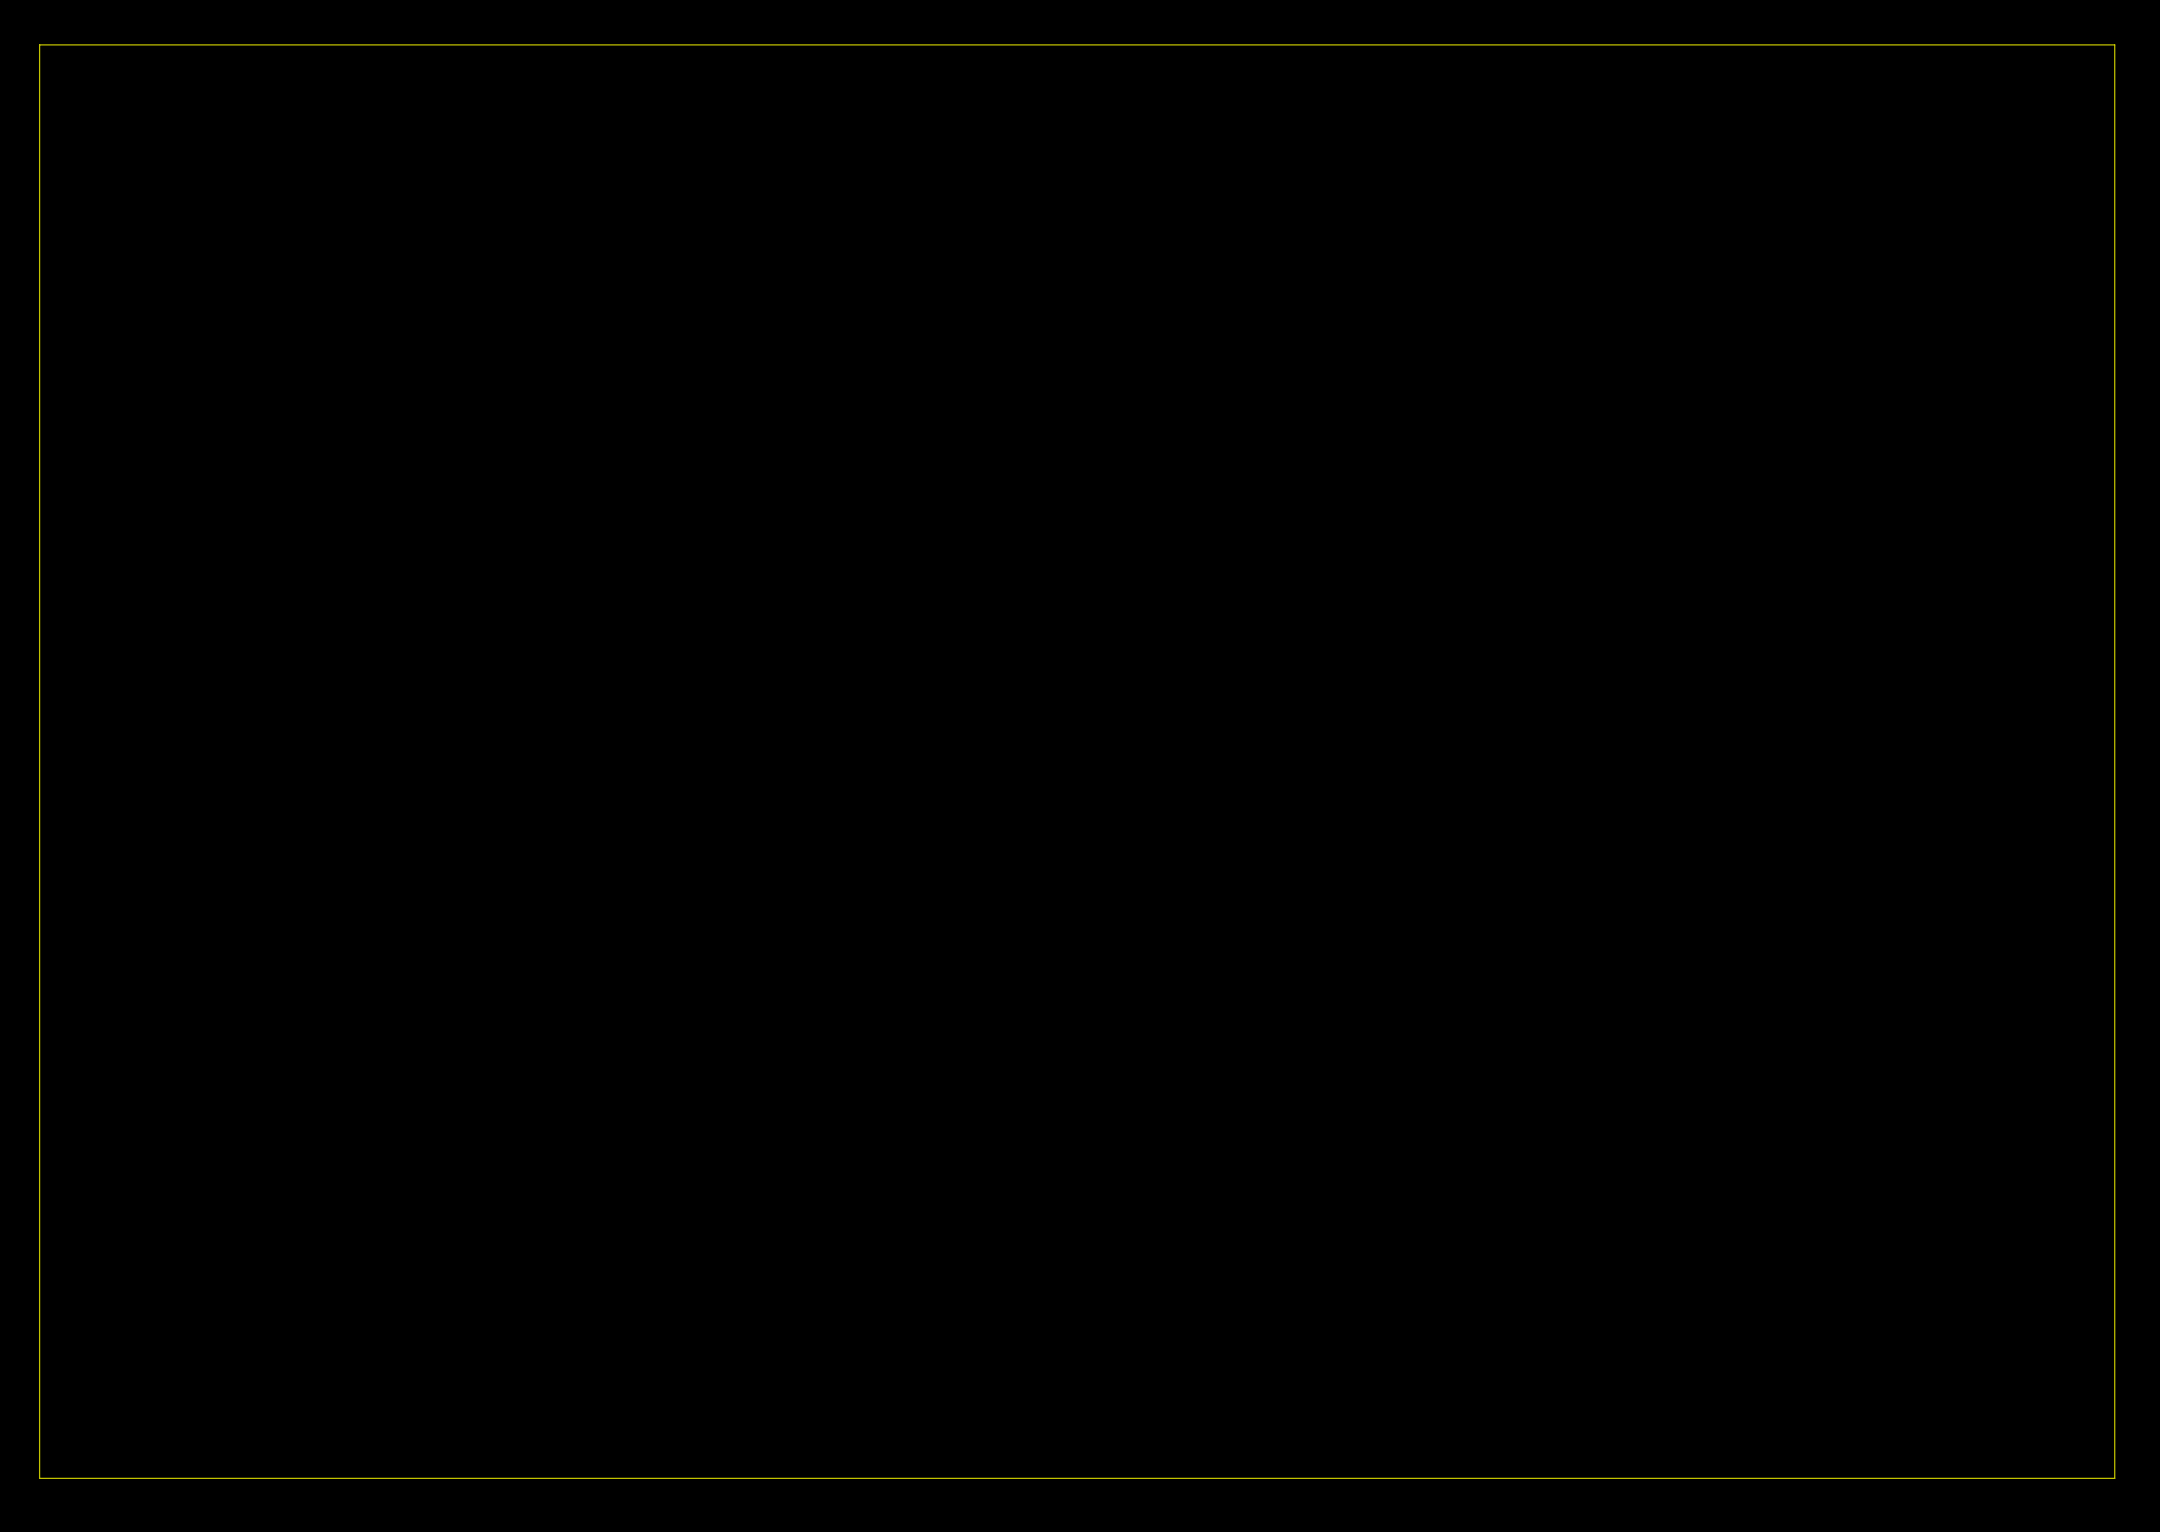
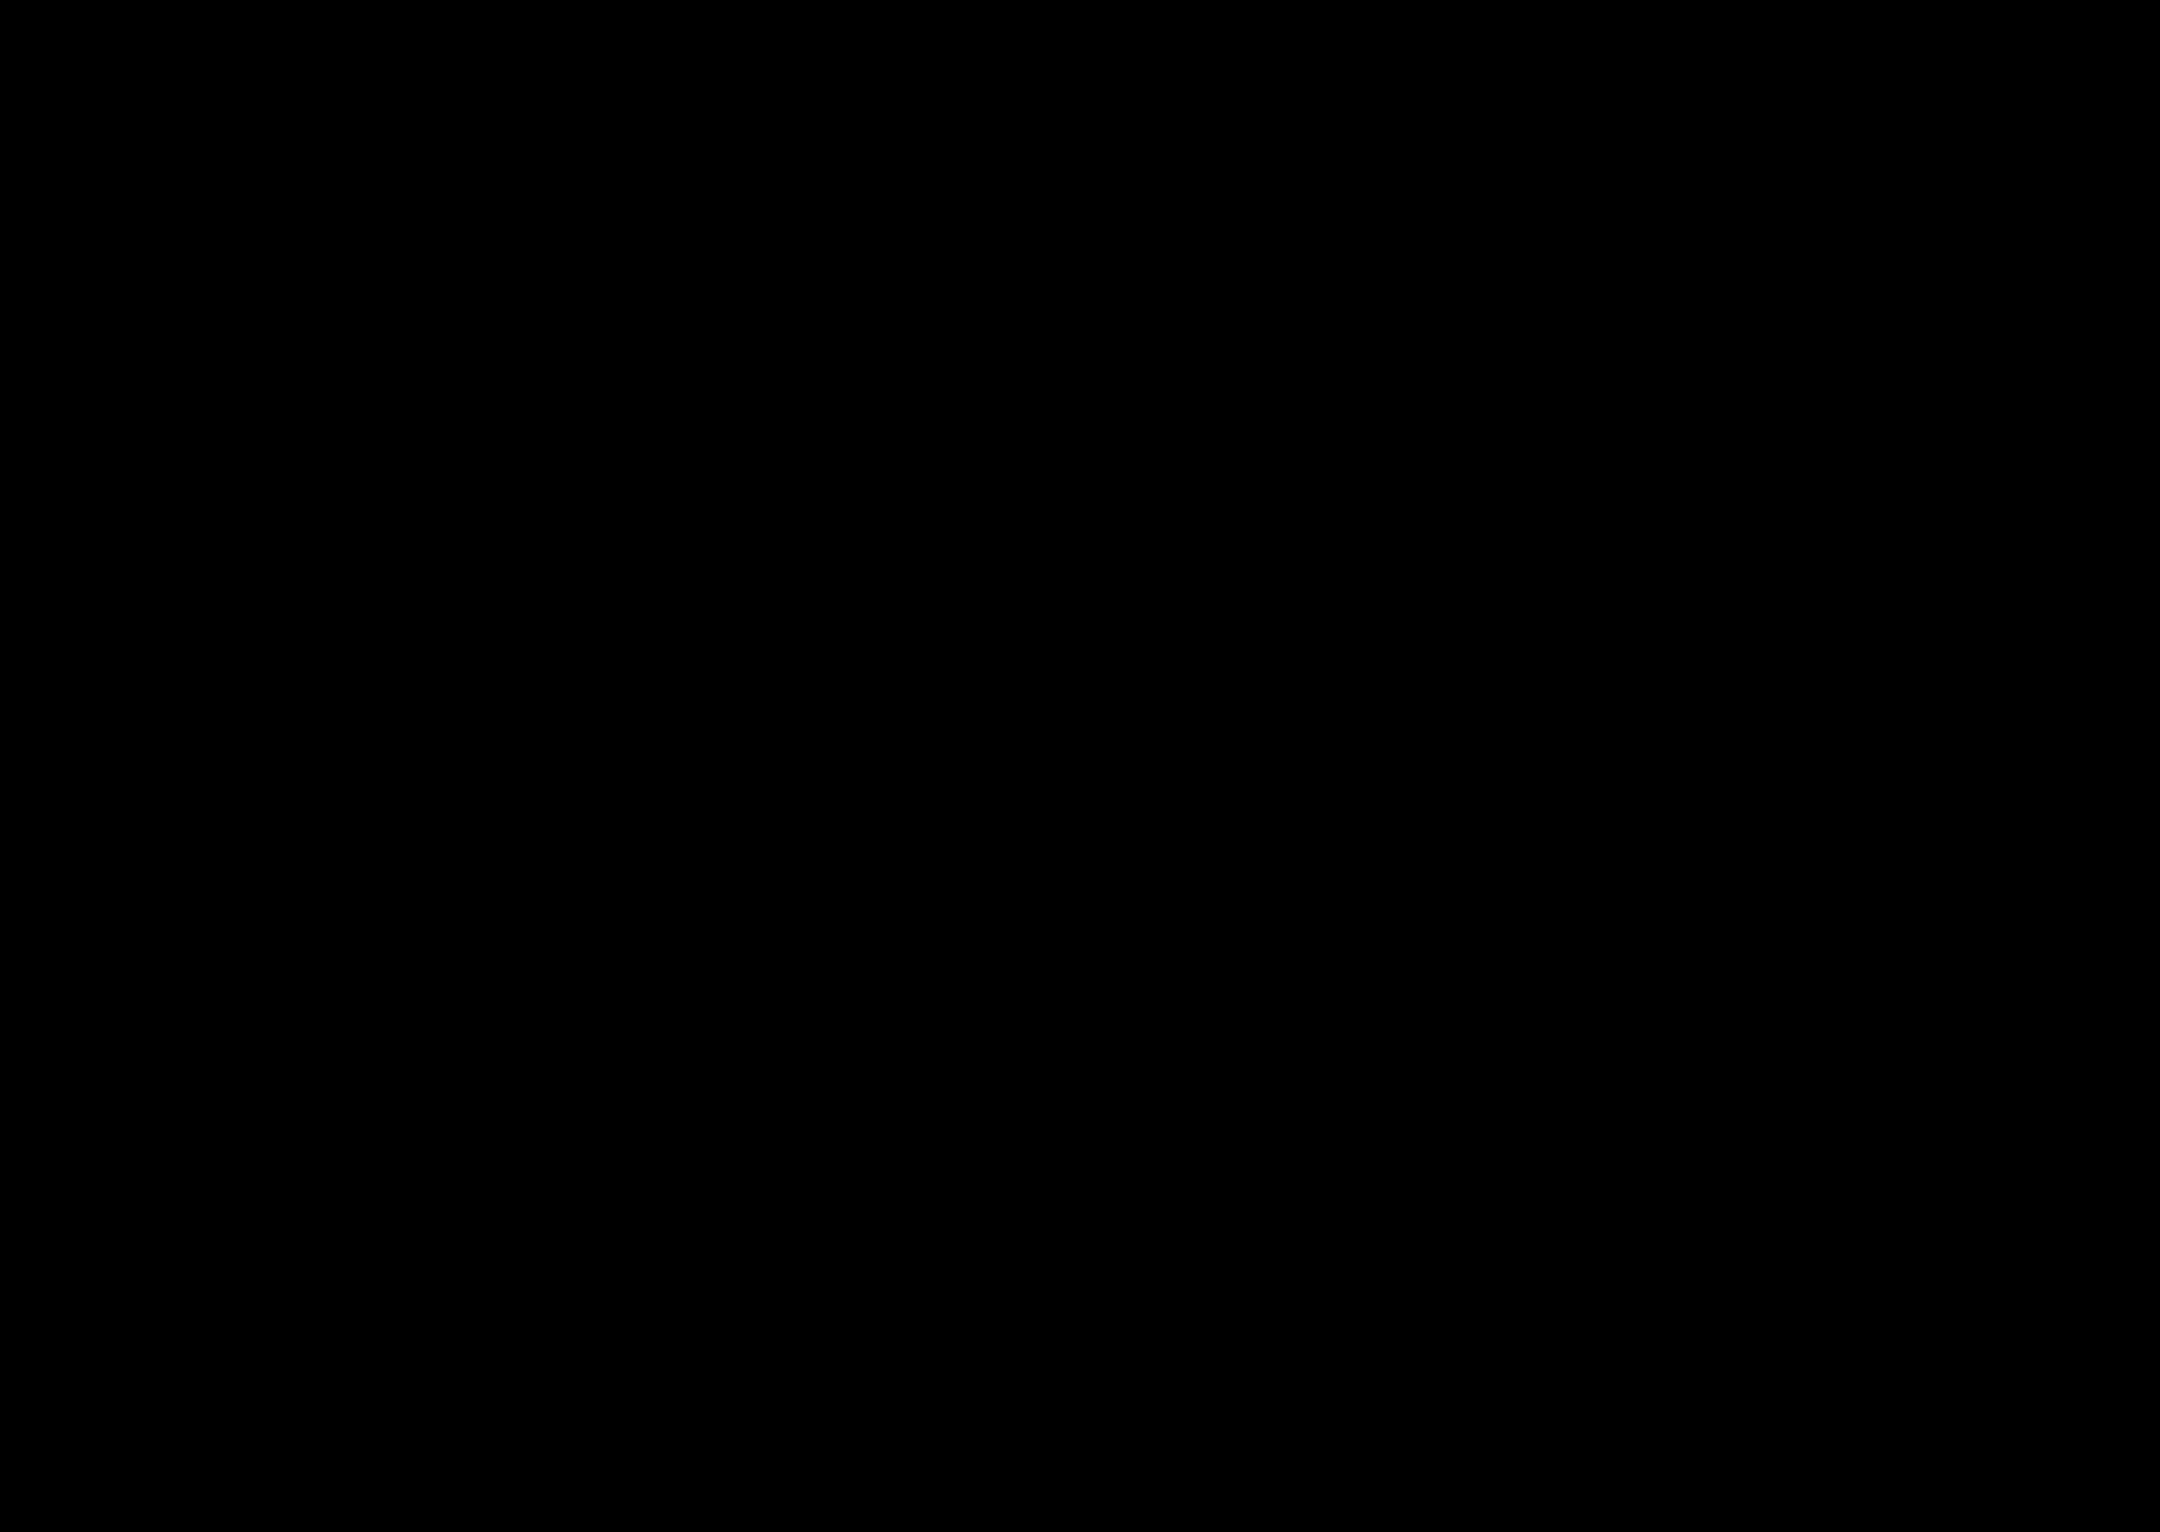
board edge: (39, 44) (2114, 44) (2114, 1478) (39, 1478) (39, 44) -> none

